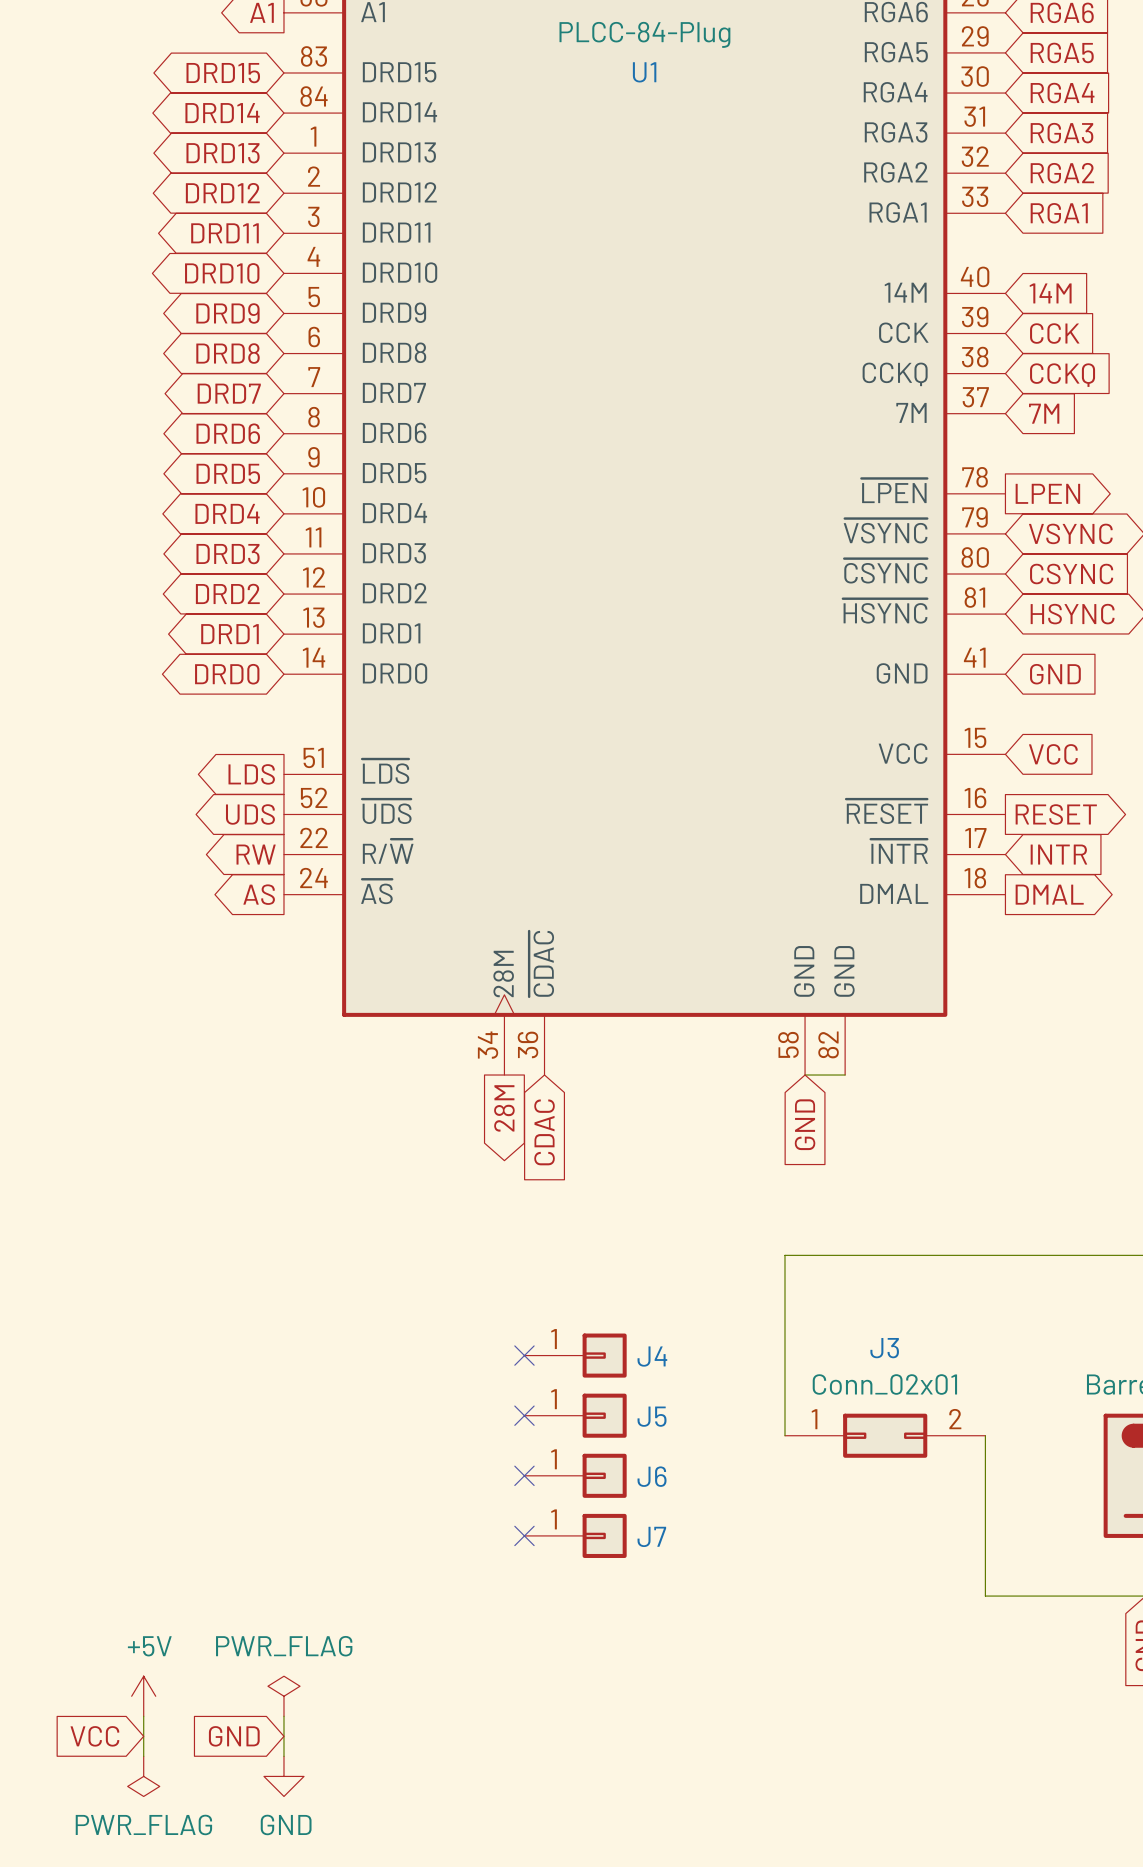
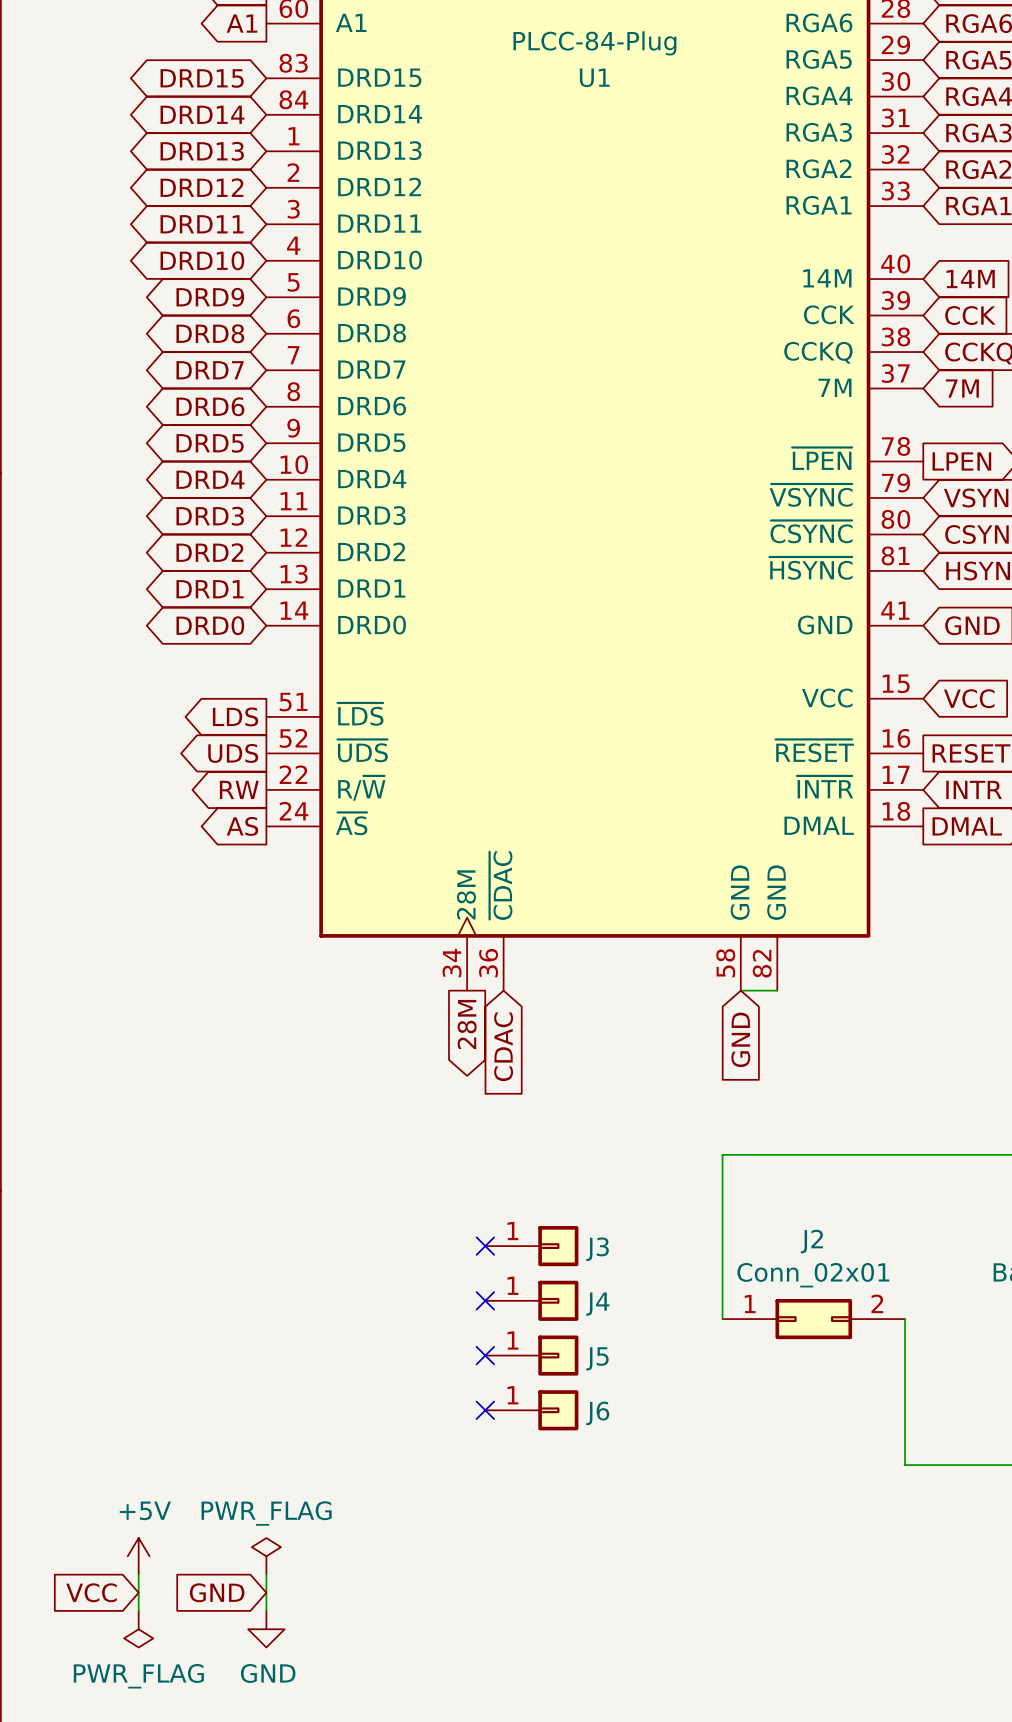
J3 name: J3 (884, 1348) -> J2 (811, 1241)
J4 name: J4 (652, 1356) -> J3 (597, 1249)
J5 name: J5 (652, 1416) -> J4 (597, 1304)
J6 name: J6 (652, 1476) -> J5 (597, 1358)
J7 name: J7 (651, 1536) -> J6 (597, 1413)

